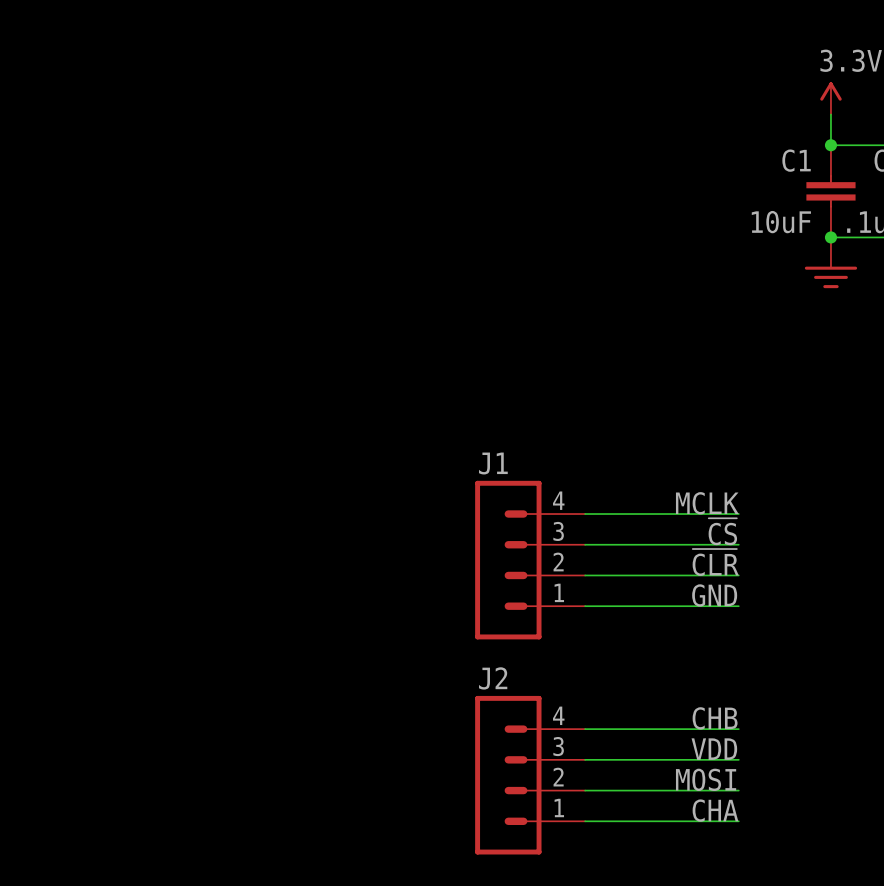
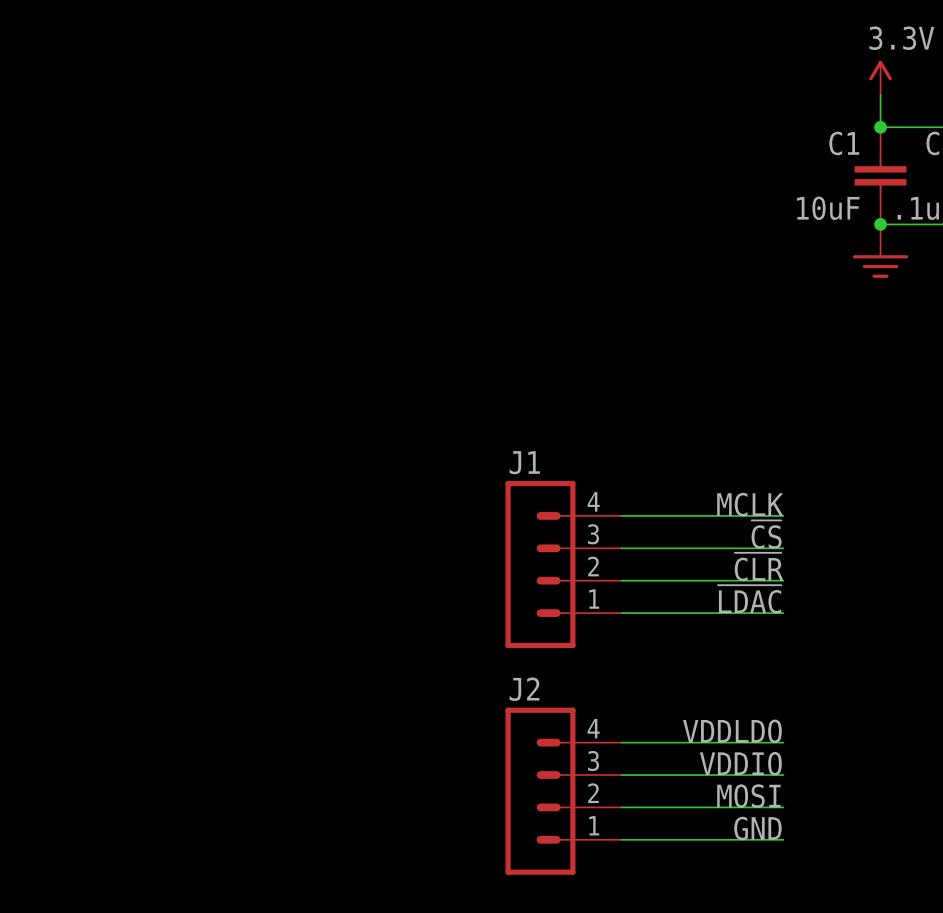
label: GND (714, 595) -> ~{LDAC} (749, 599)
label: CHB (715, 718) -> VDDLDO (732, 731)
label: VDD (714, 749) -> VDDIO (740, 763)
label: CHA (715, 810) -> GND (757, 828)

